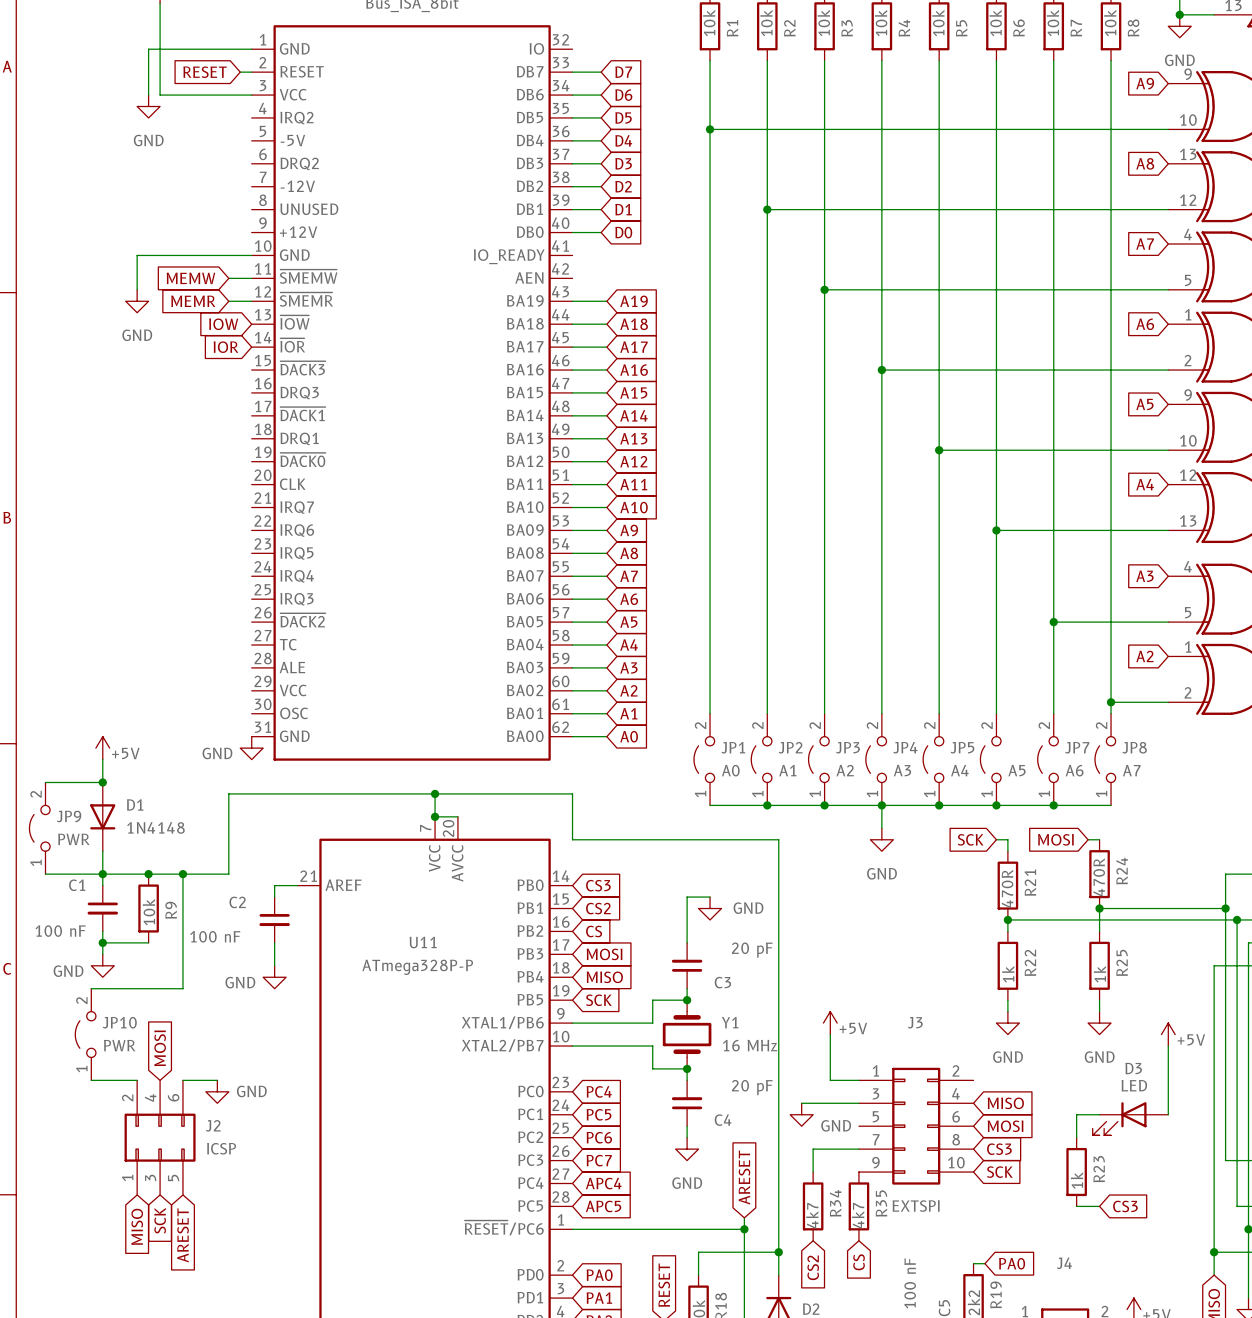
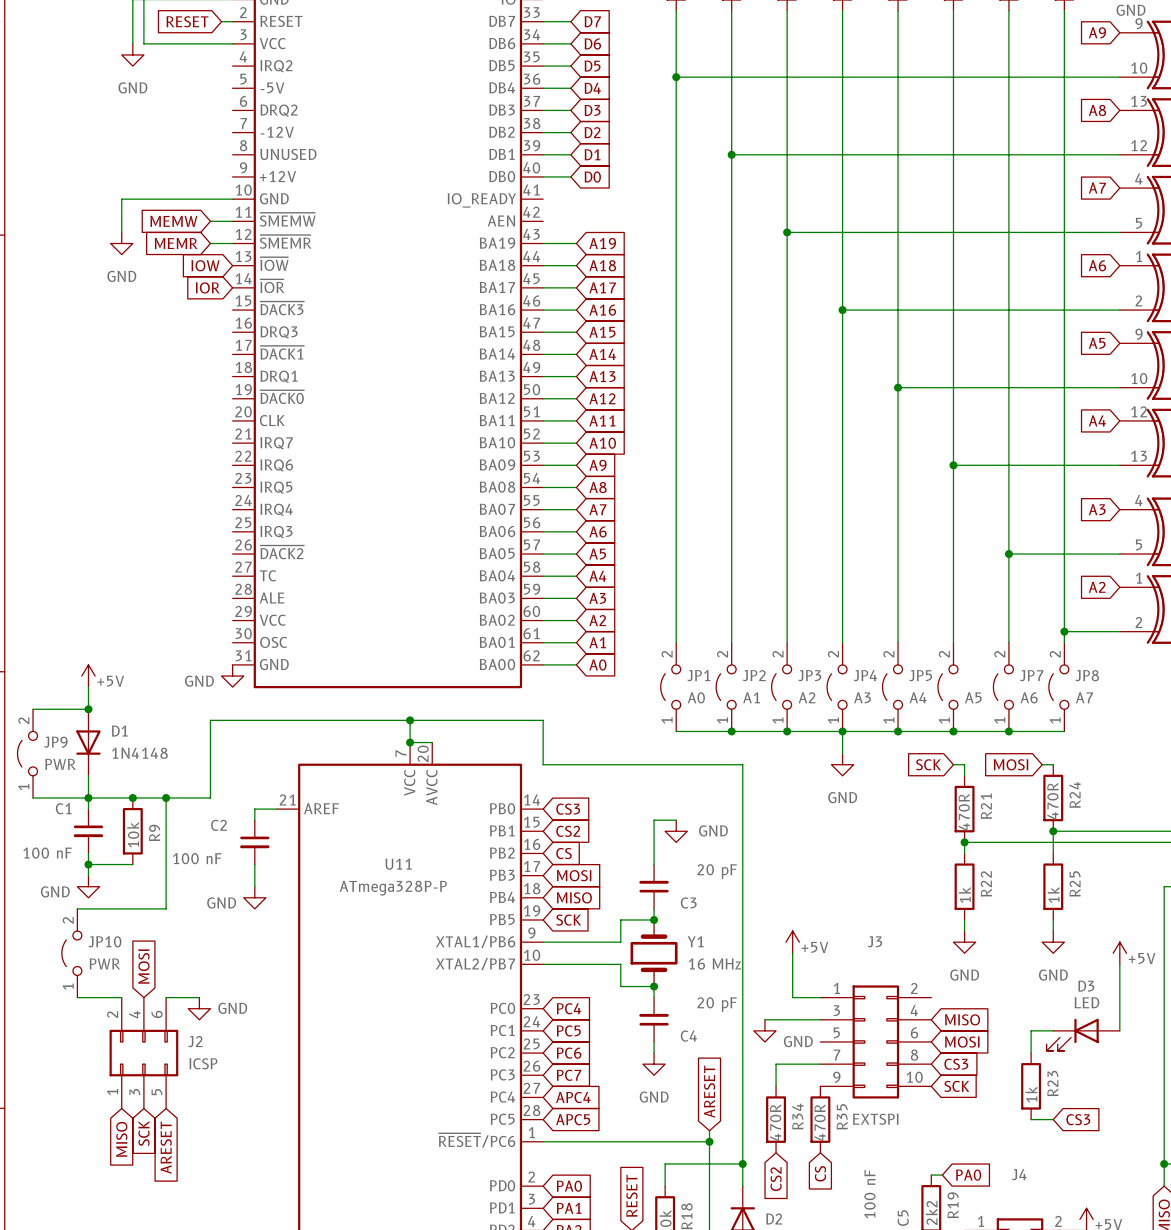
R34 value: 4k7 (812, 1215) -> 470R (775, 1122)
R35 value: 4k7 (858, 1215) -> 470R (820, 1122)

